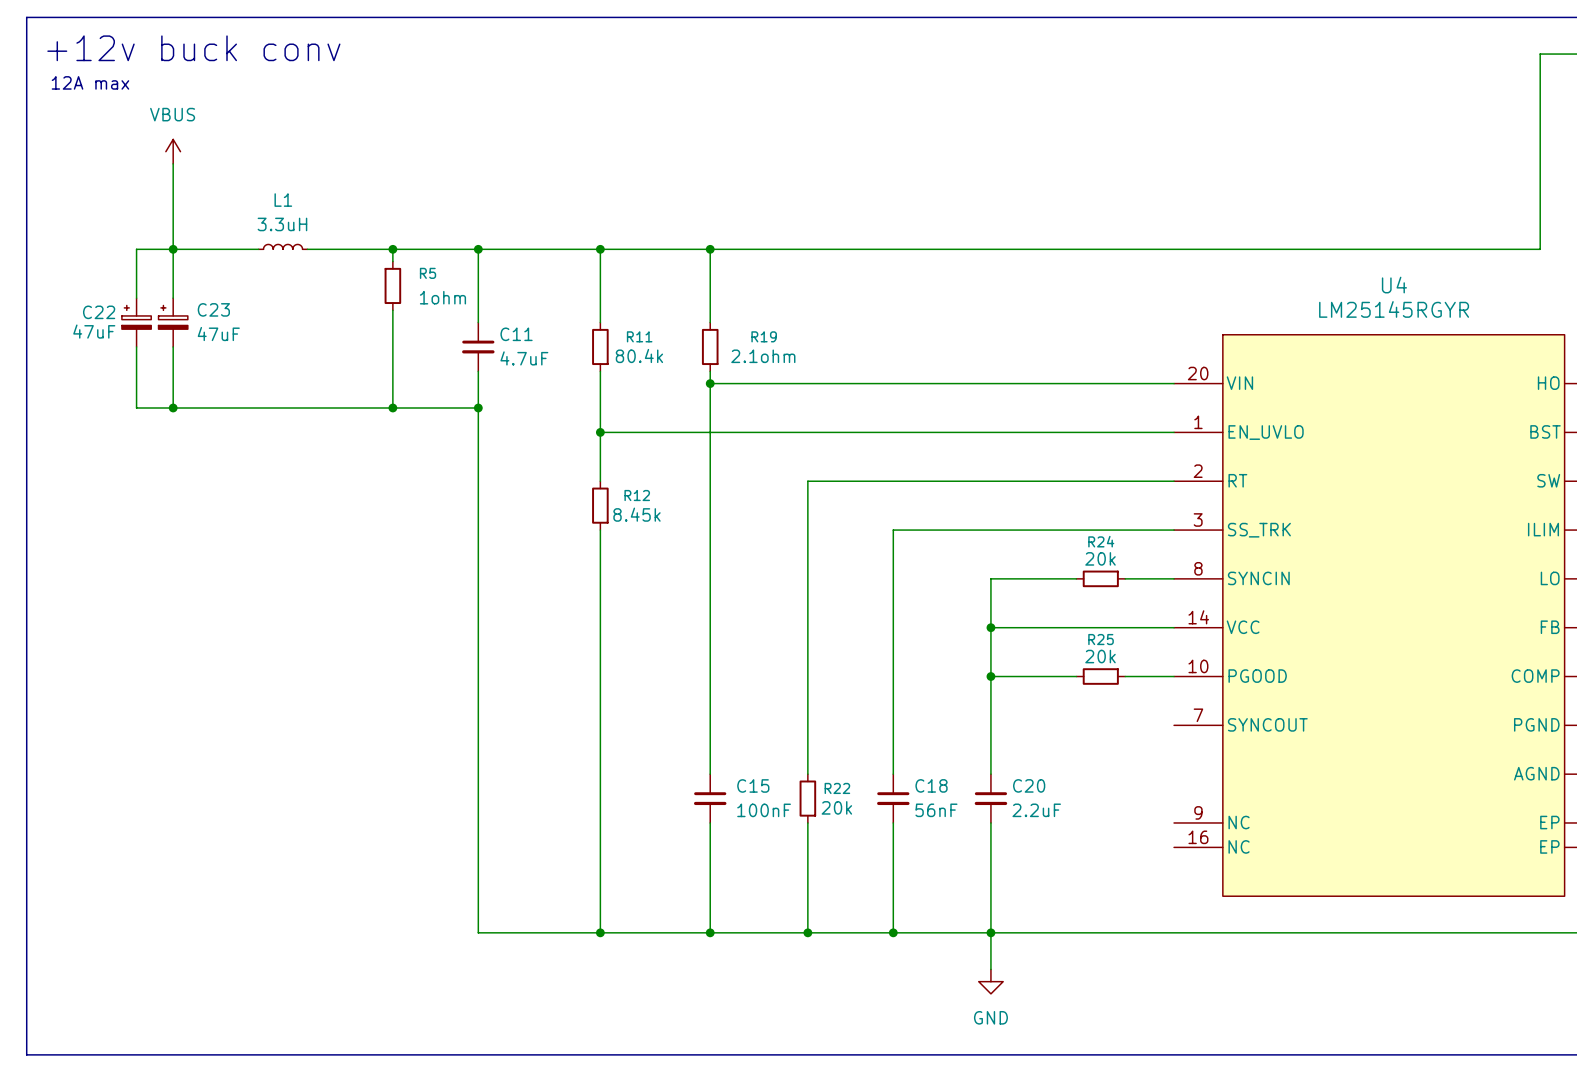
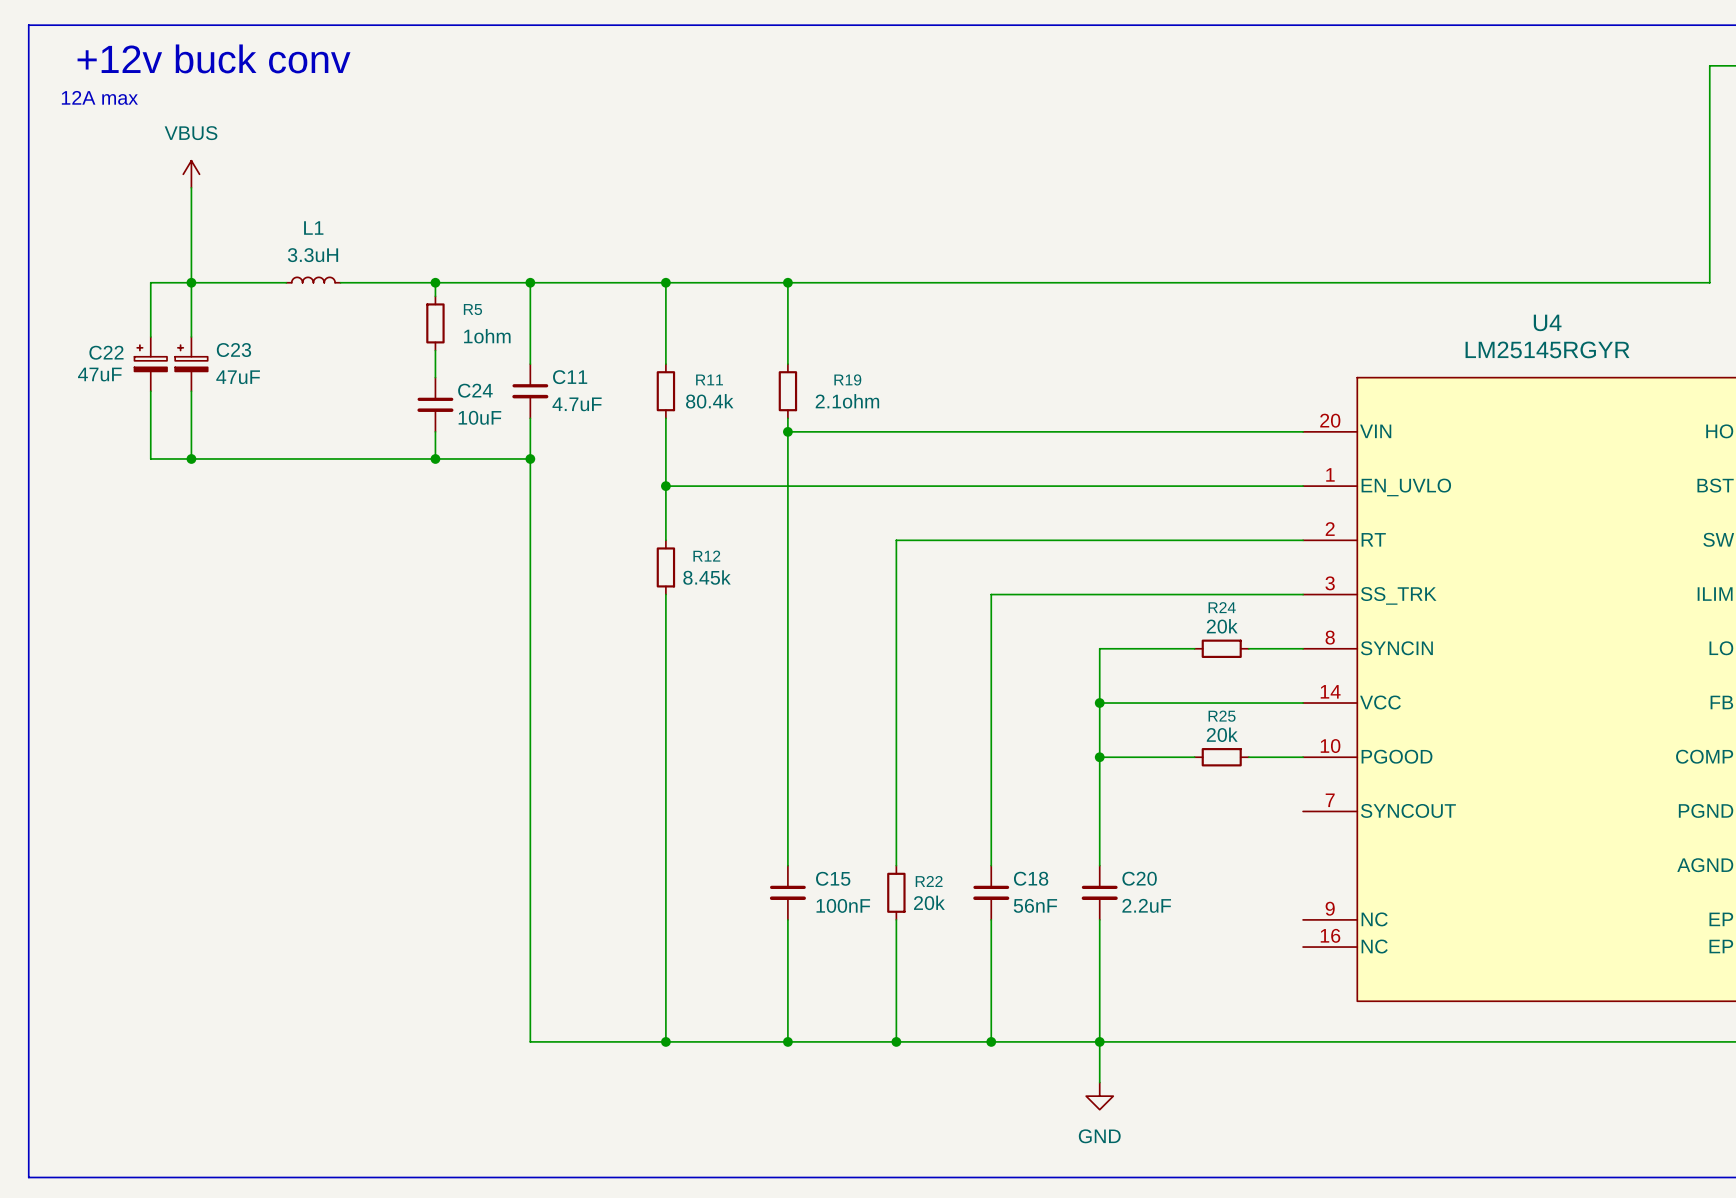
C24: none -> 10uF (435, 404)

